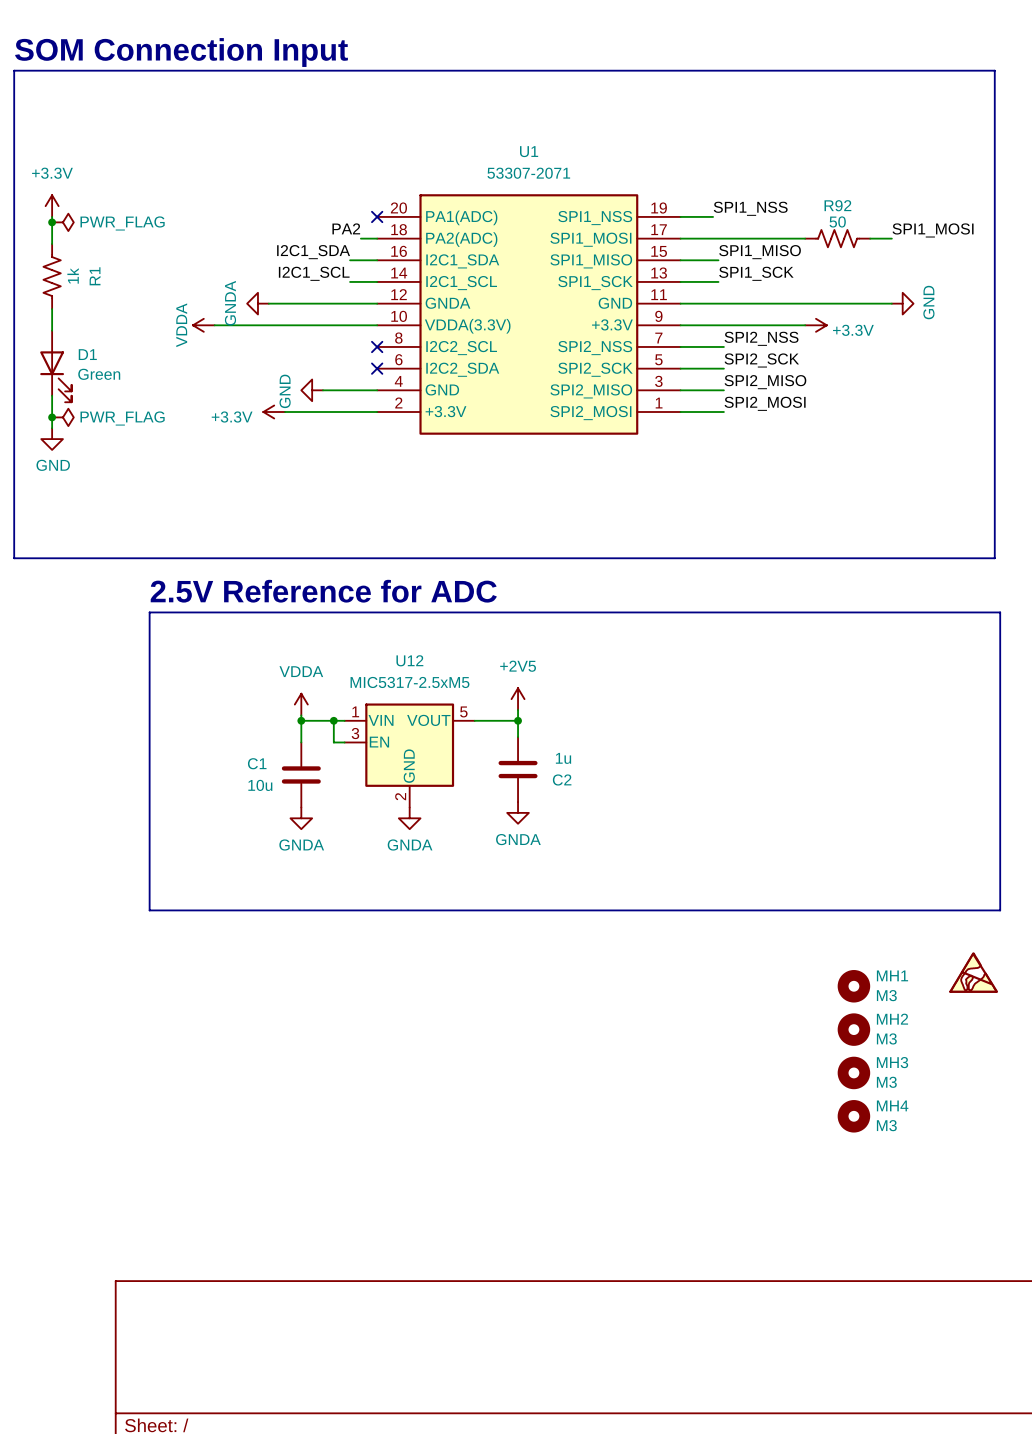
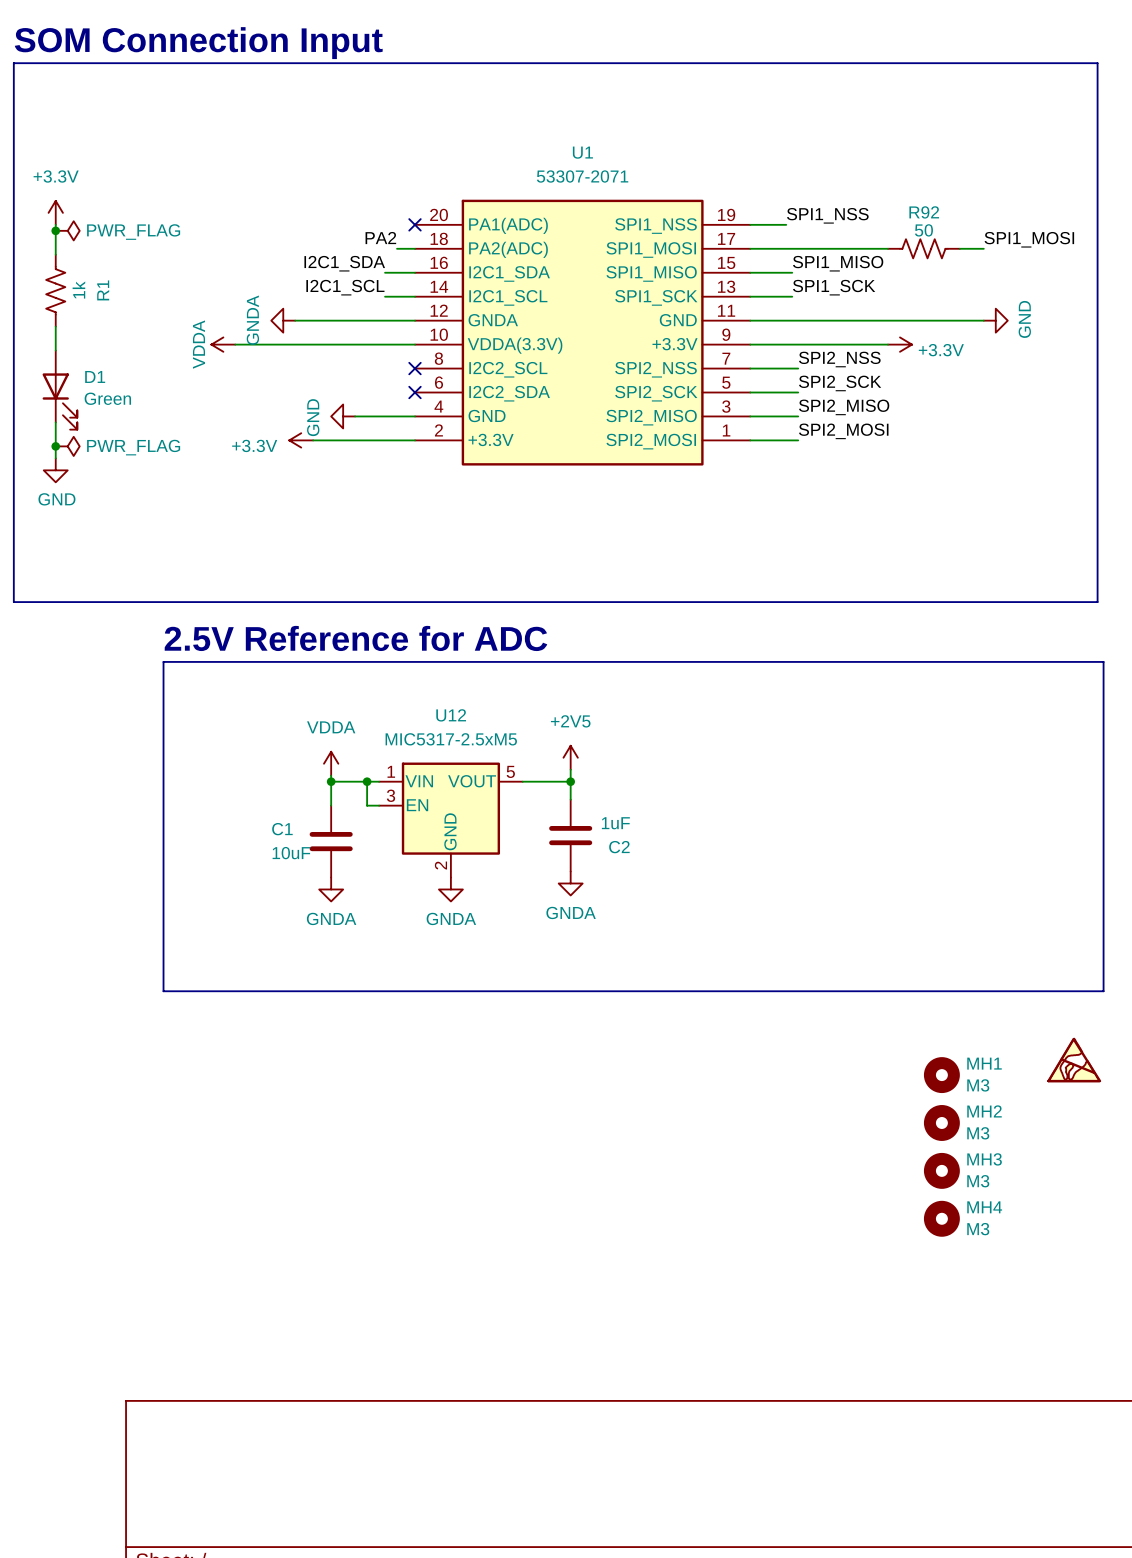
C2 value: 1u (563, 758) -> 1uF (615, 823)
C1 value: 10u (260, 785) -> 10uF (291, 853)

